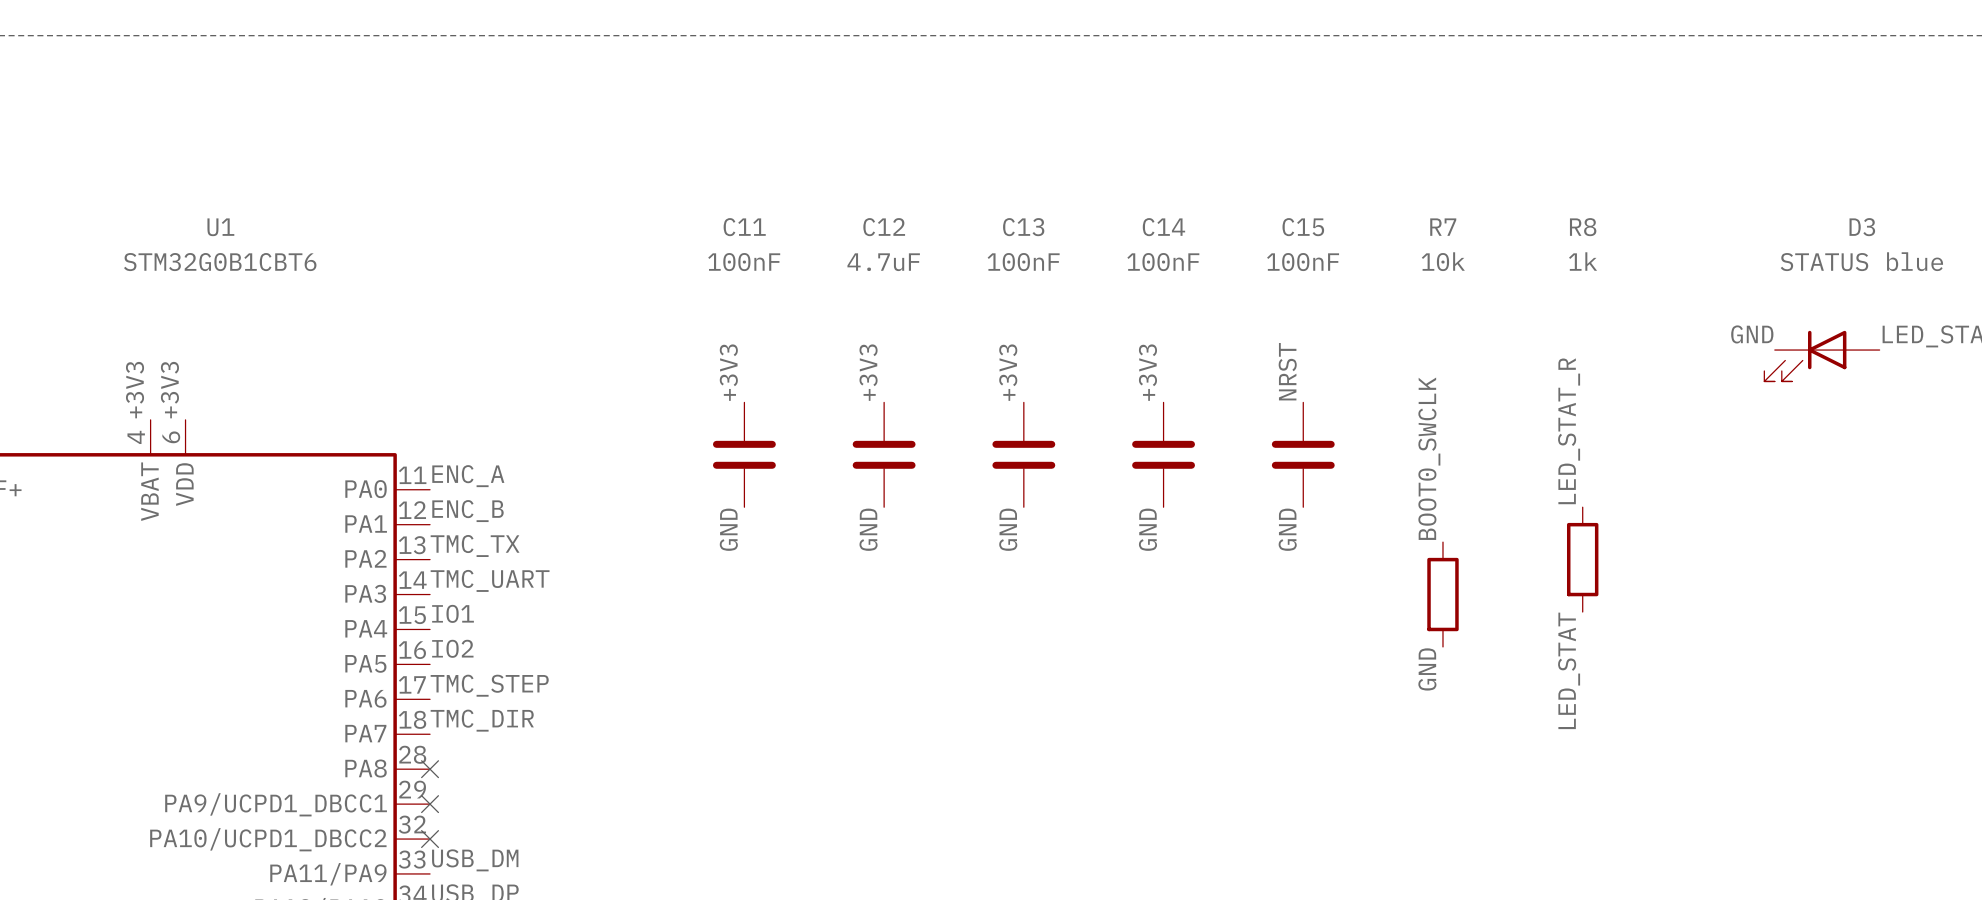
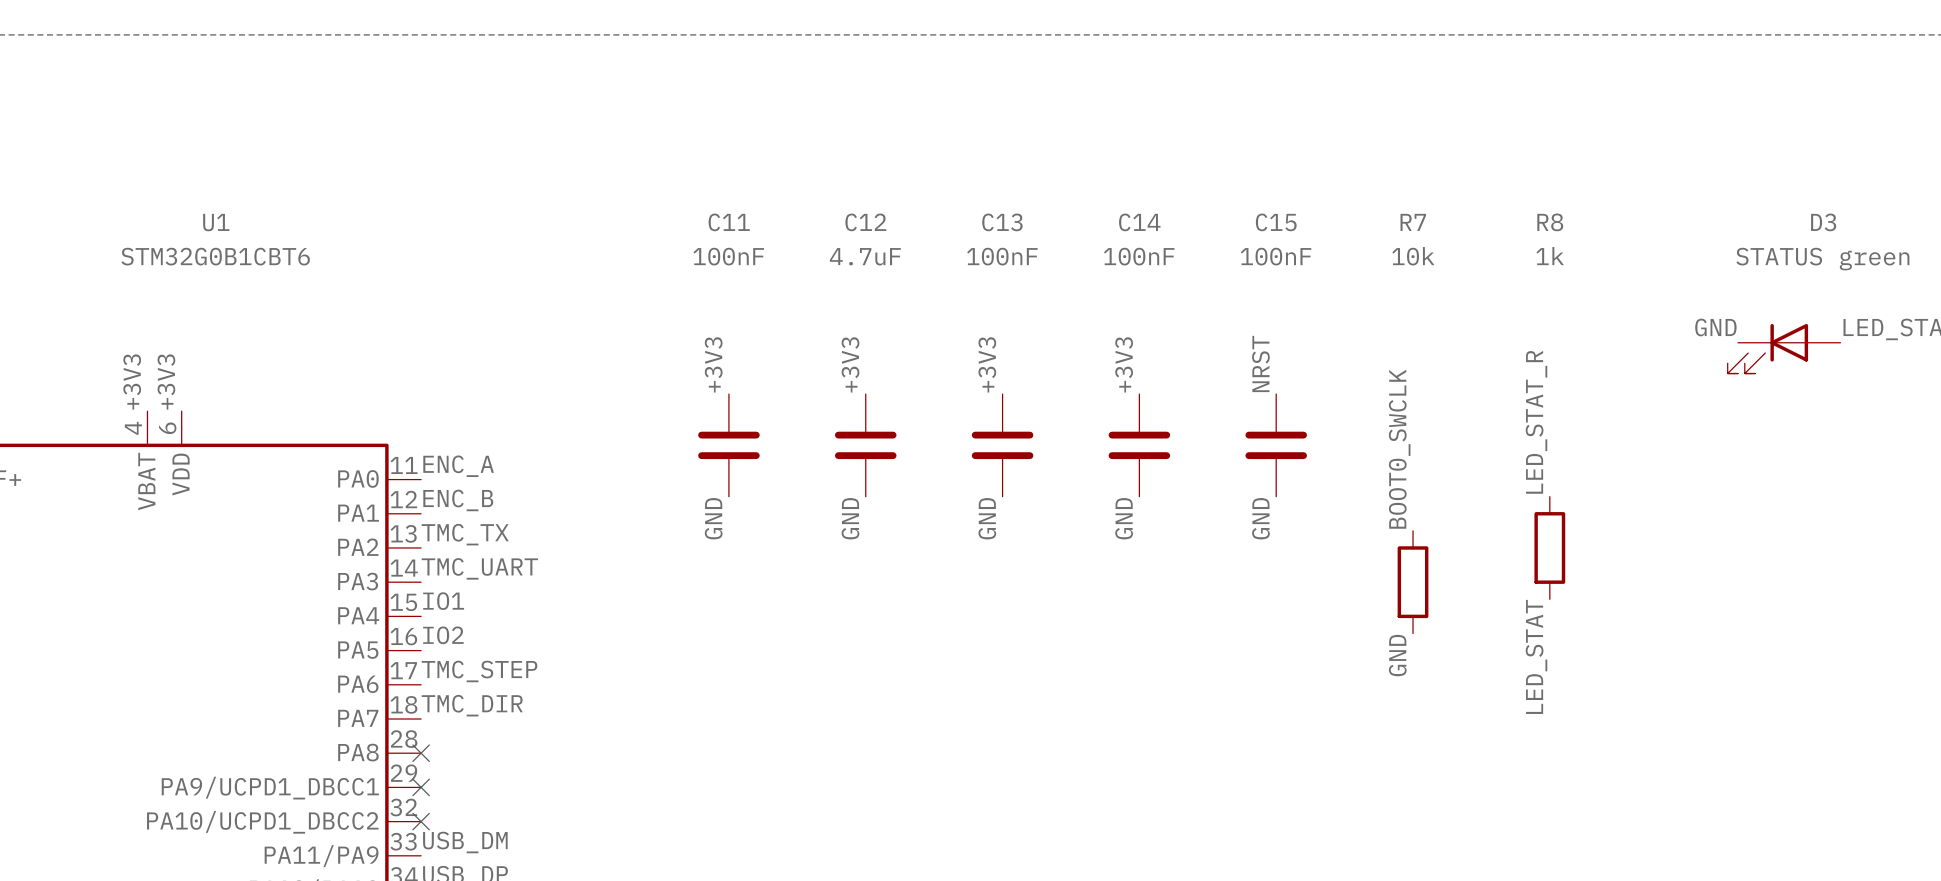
D3 value: STATUS blue (1861, 261) -> STATUS green (1822, 259)

